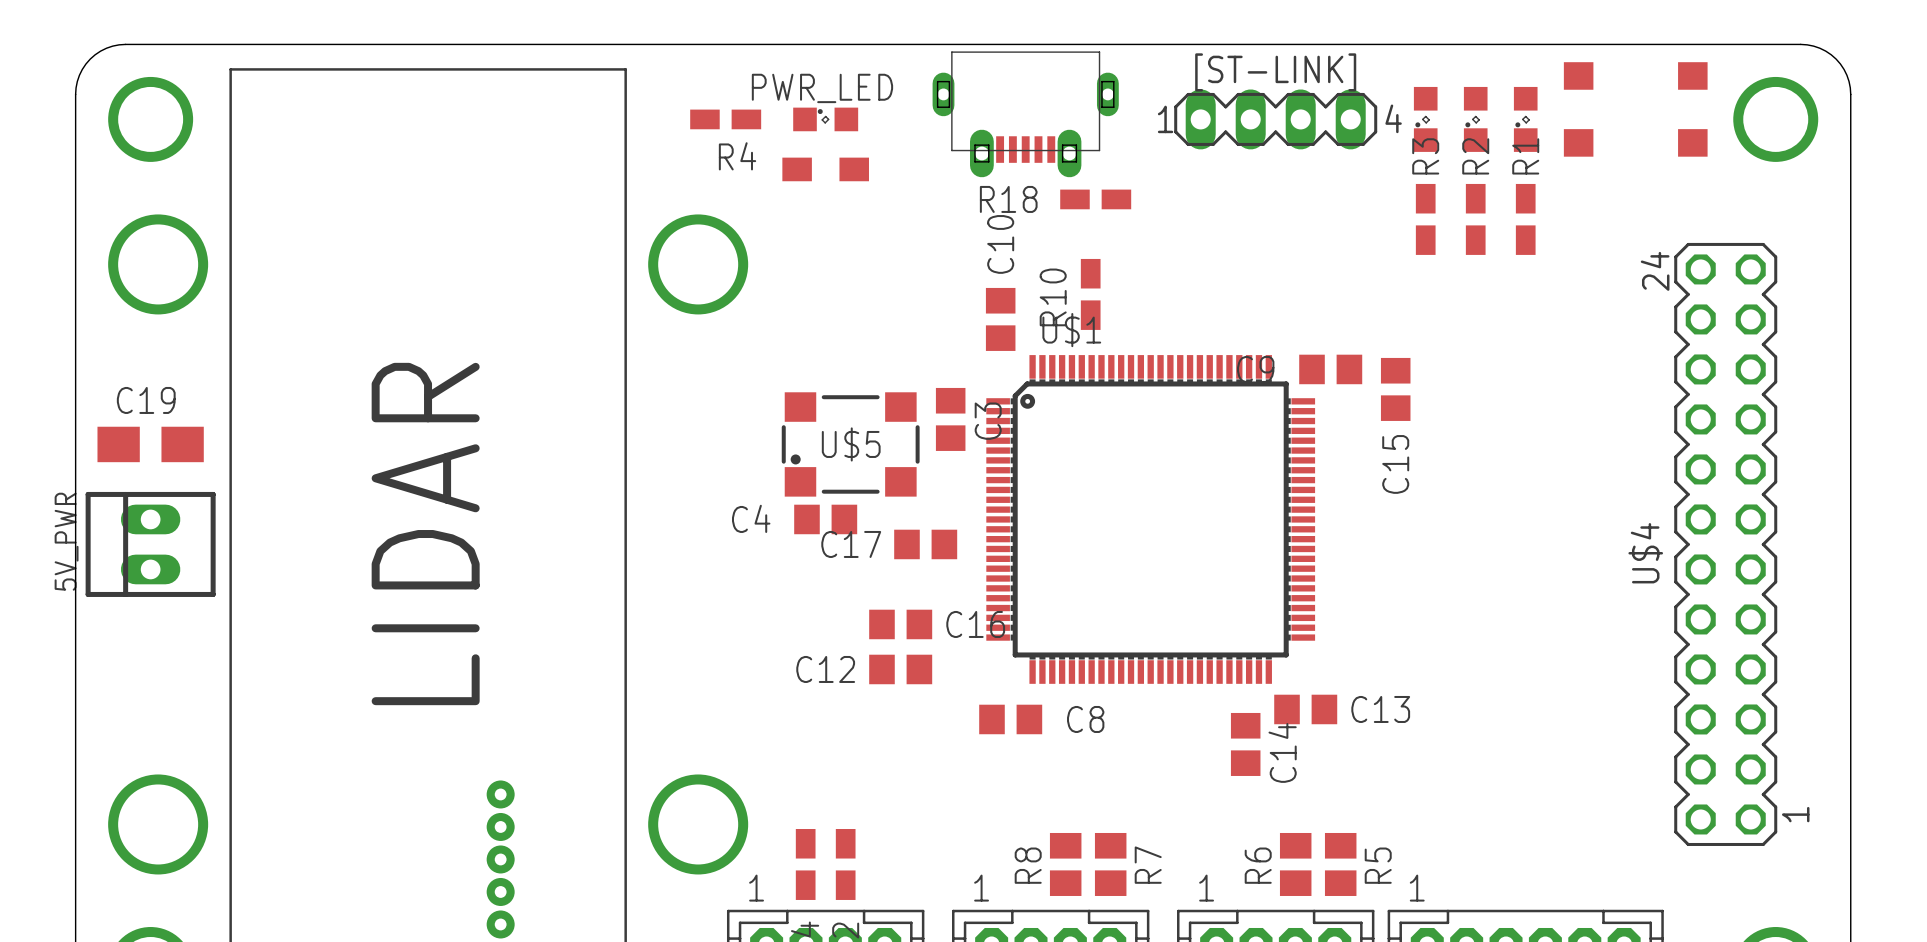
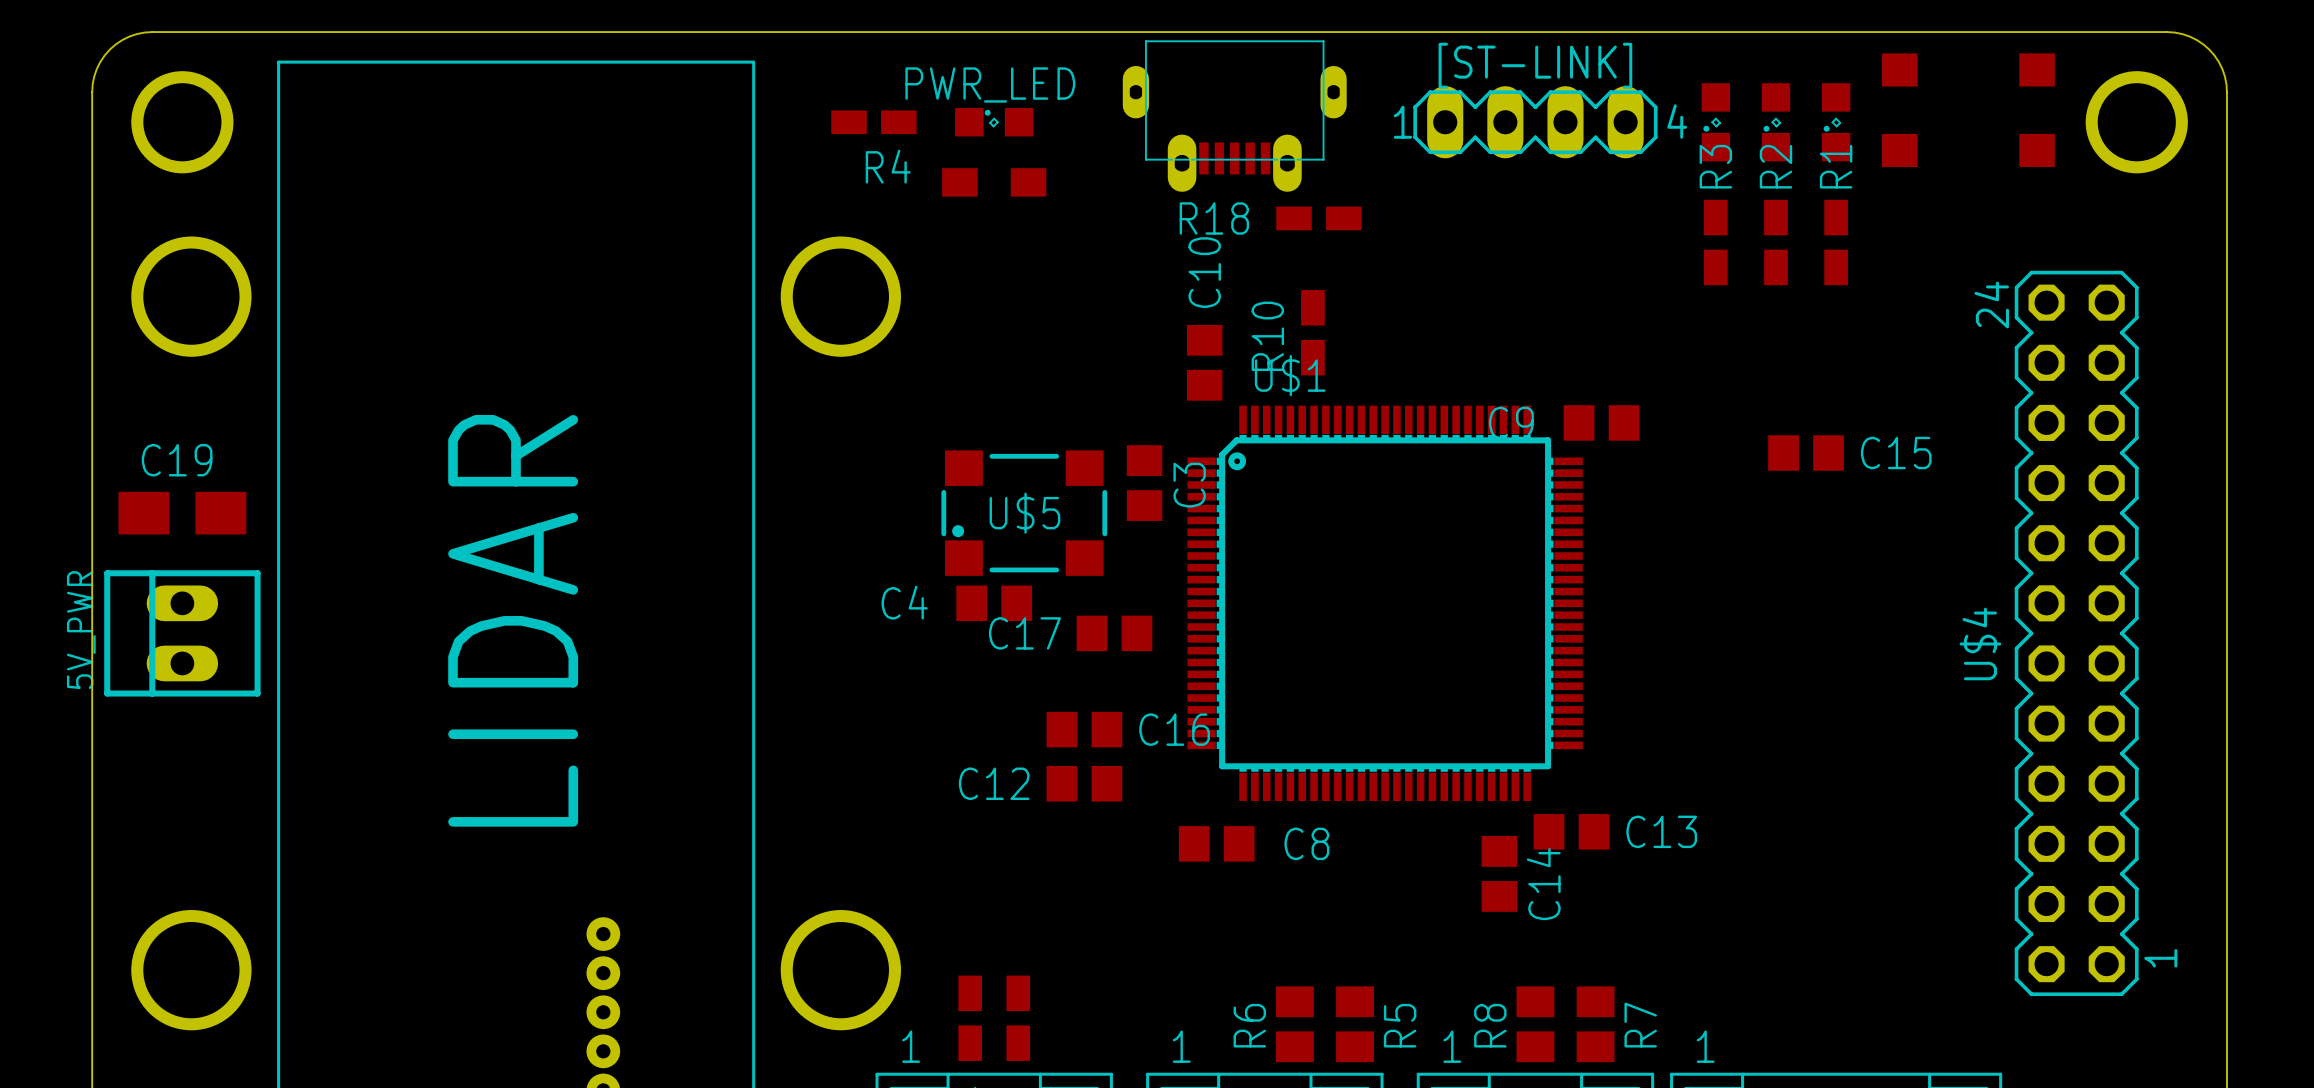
C15 rotation: 0° (1395, 389) -> 90° clockwise (1806, 452)
C15 position: (1395, 389) -> (1806, 452)
C15 name position: C15 (1395, 464) -> C15 (1896, 452)
R8 position: (1065, 864) -> (1535, 1024)
R7 position: (1110, 864) -> (1595, 1024)
R6 position: (1295, 864) -> (1294, 1024)
R5 position: (1340, 864) -> (1355, 1024)

